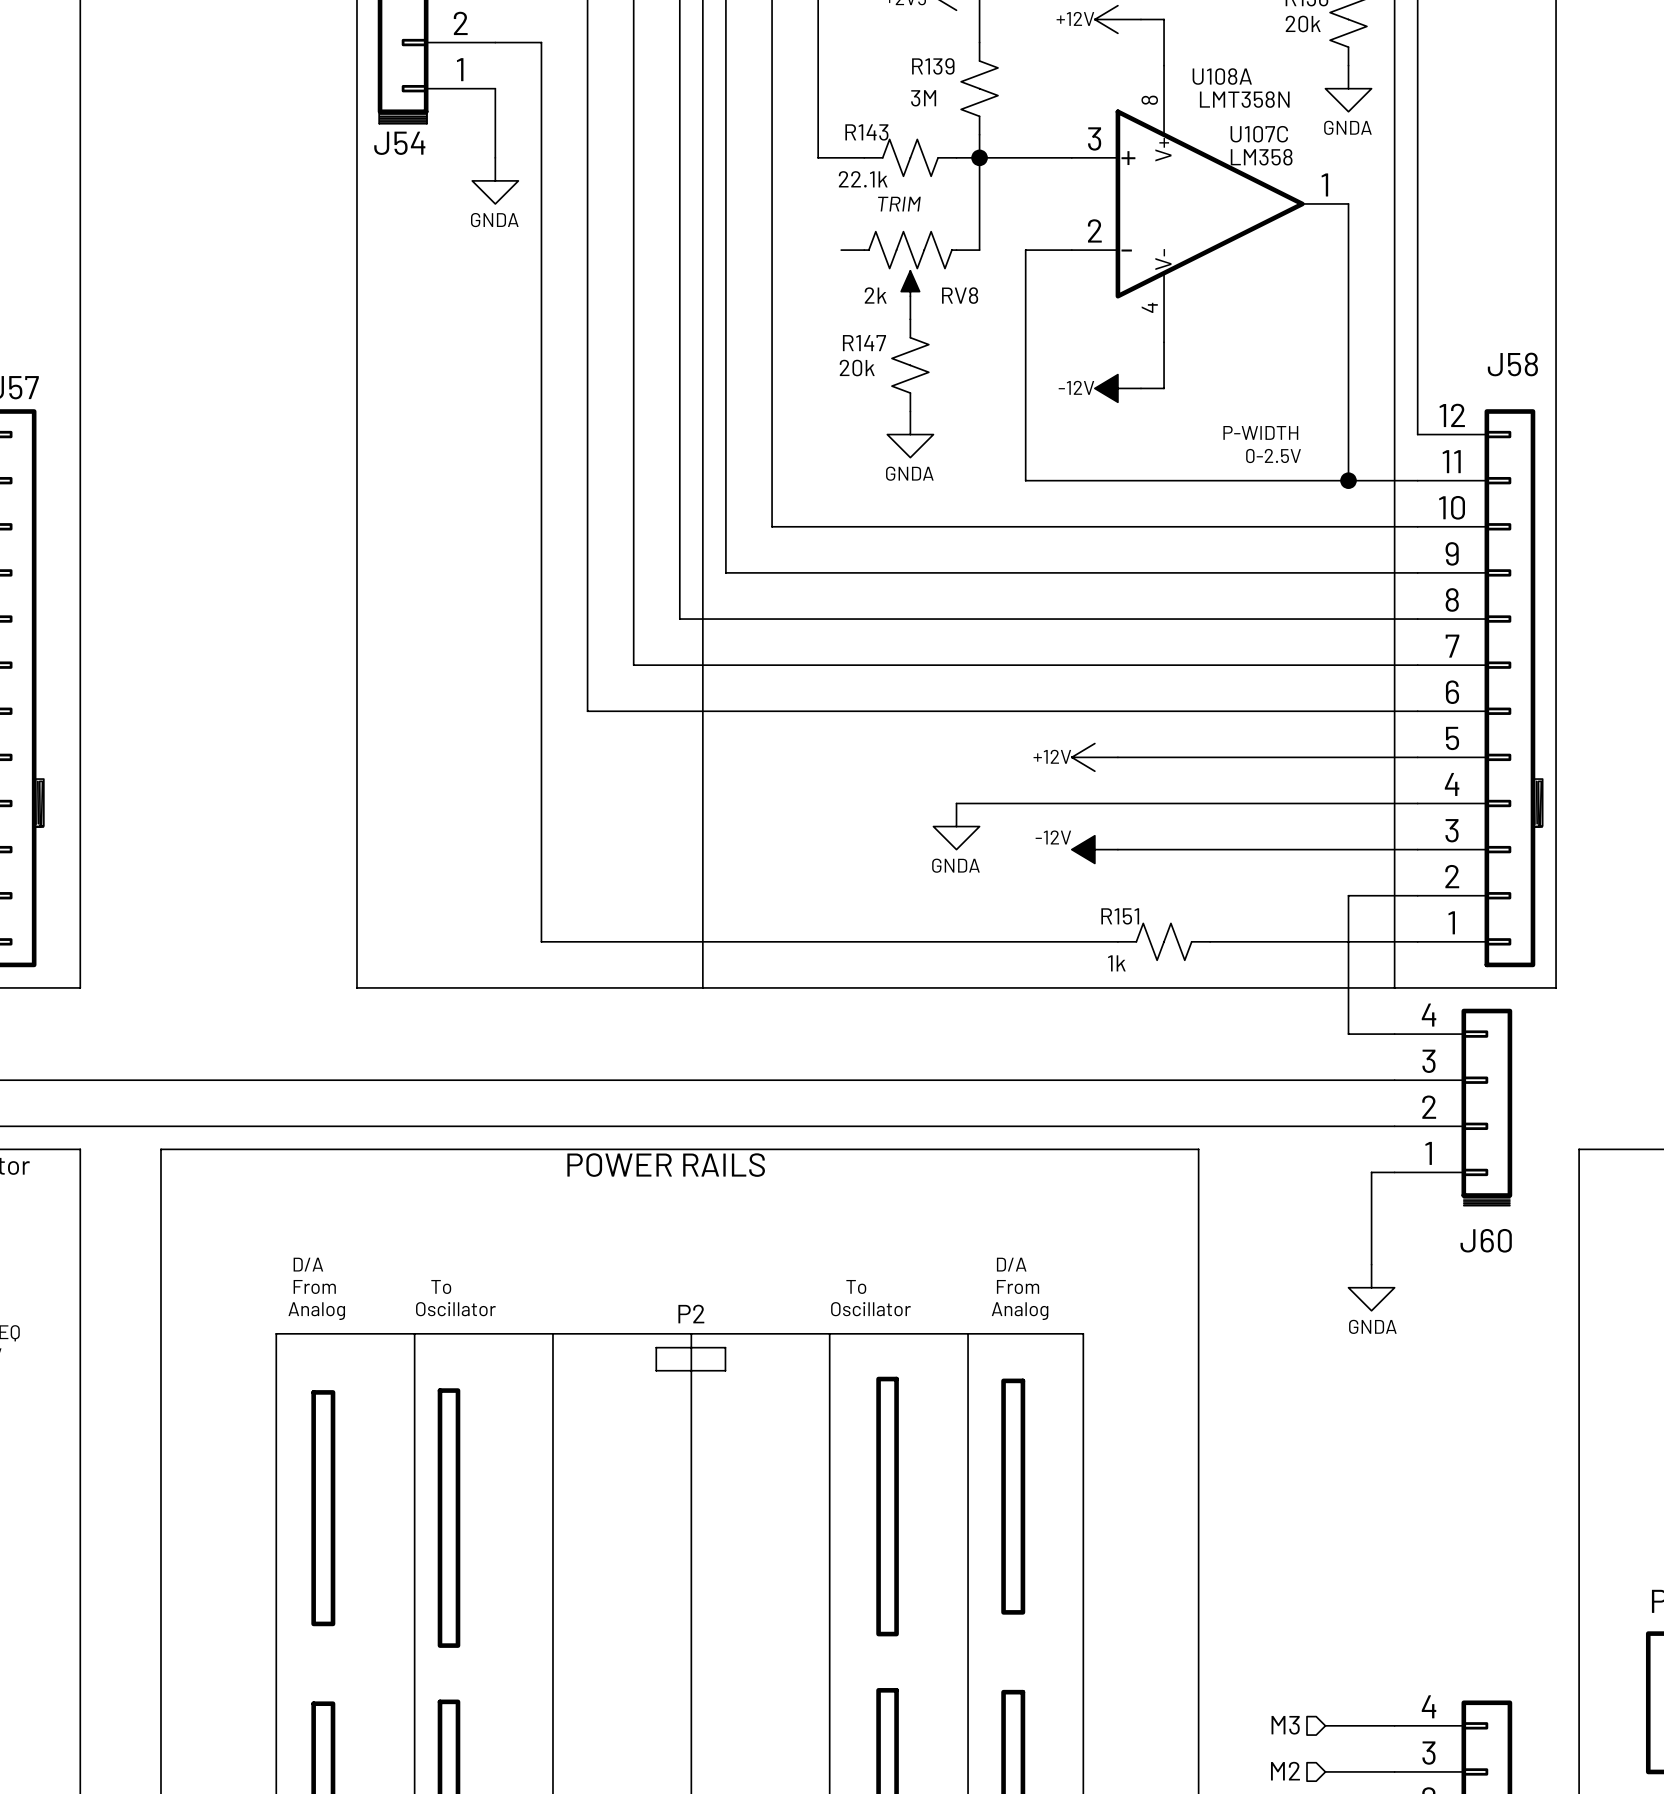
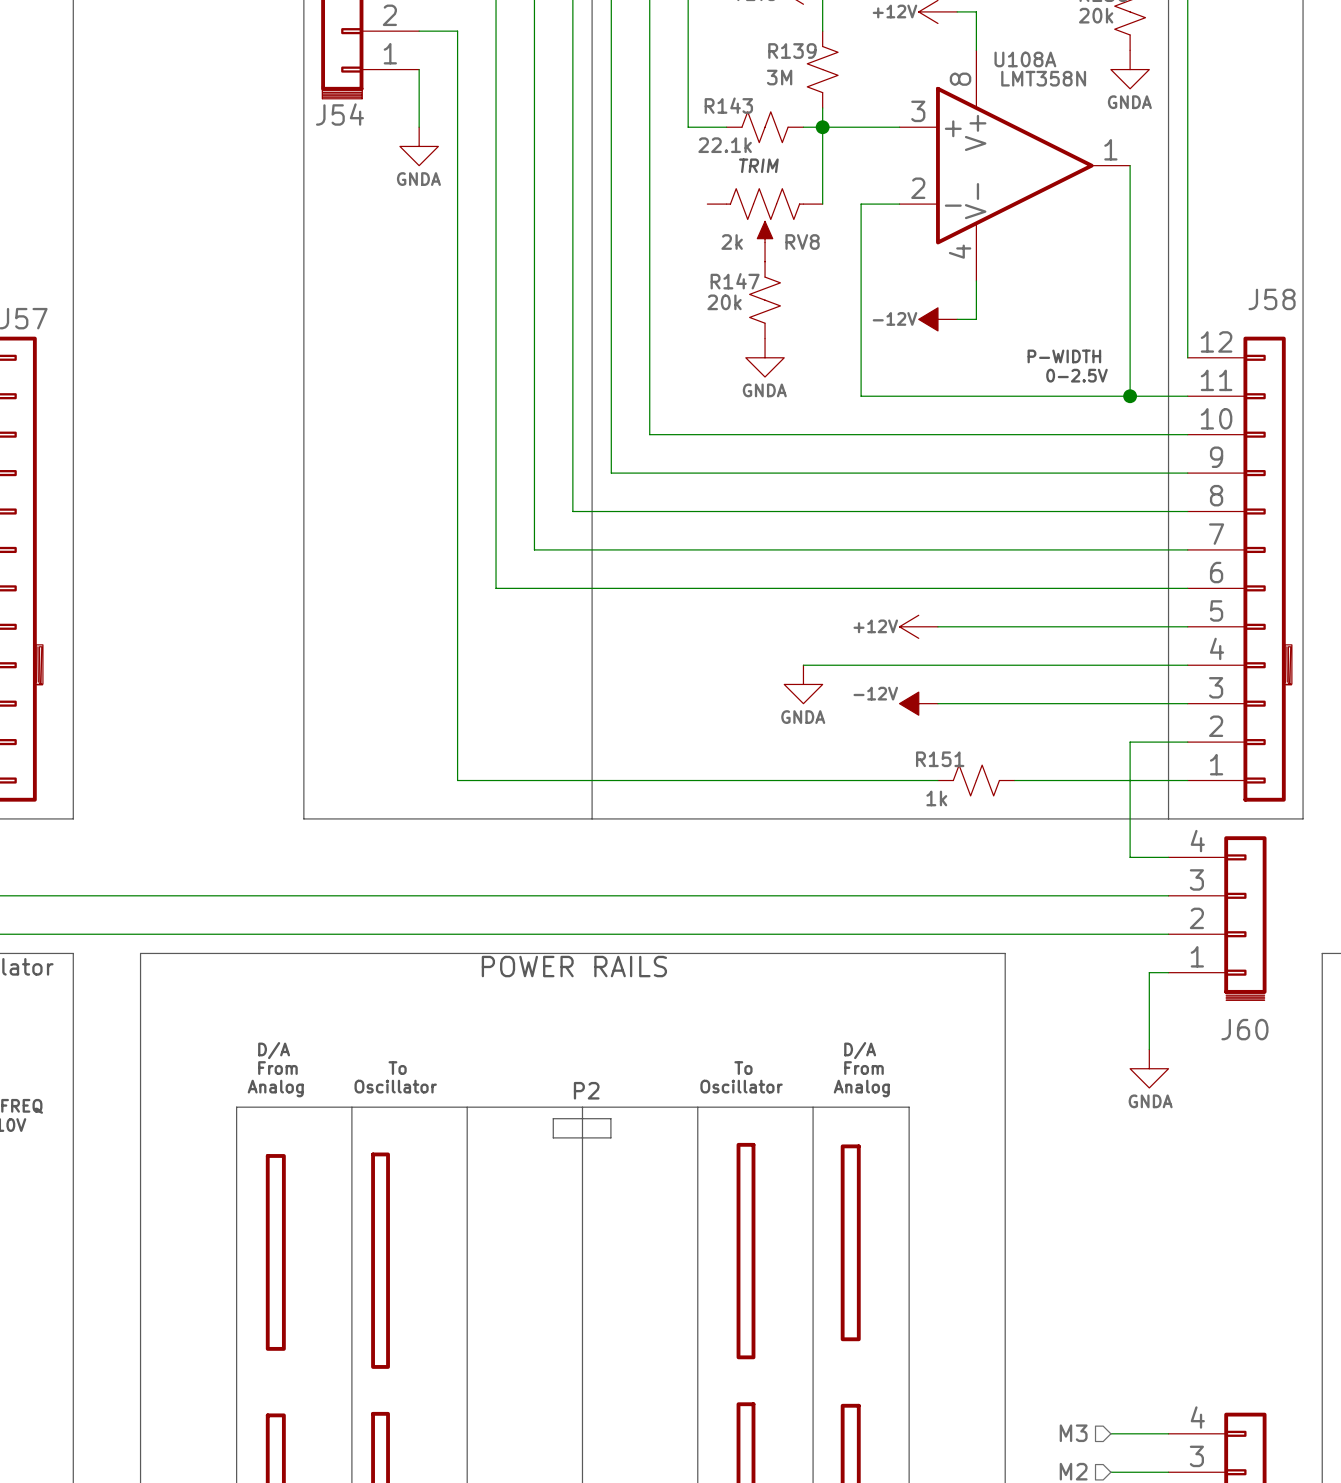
U107C symbol: [1164, 65, 1165, 343] -> [976, 50, 977, 281]
U107C name: U107C (1259, 134) -> none
U107C value: LM358 (1261, 157) -> none

